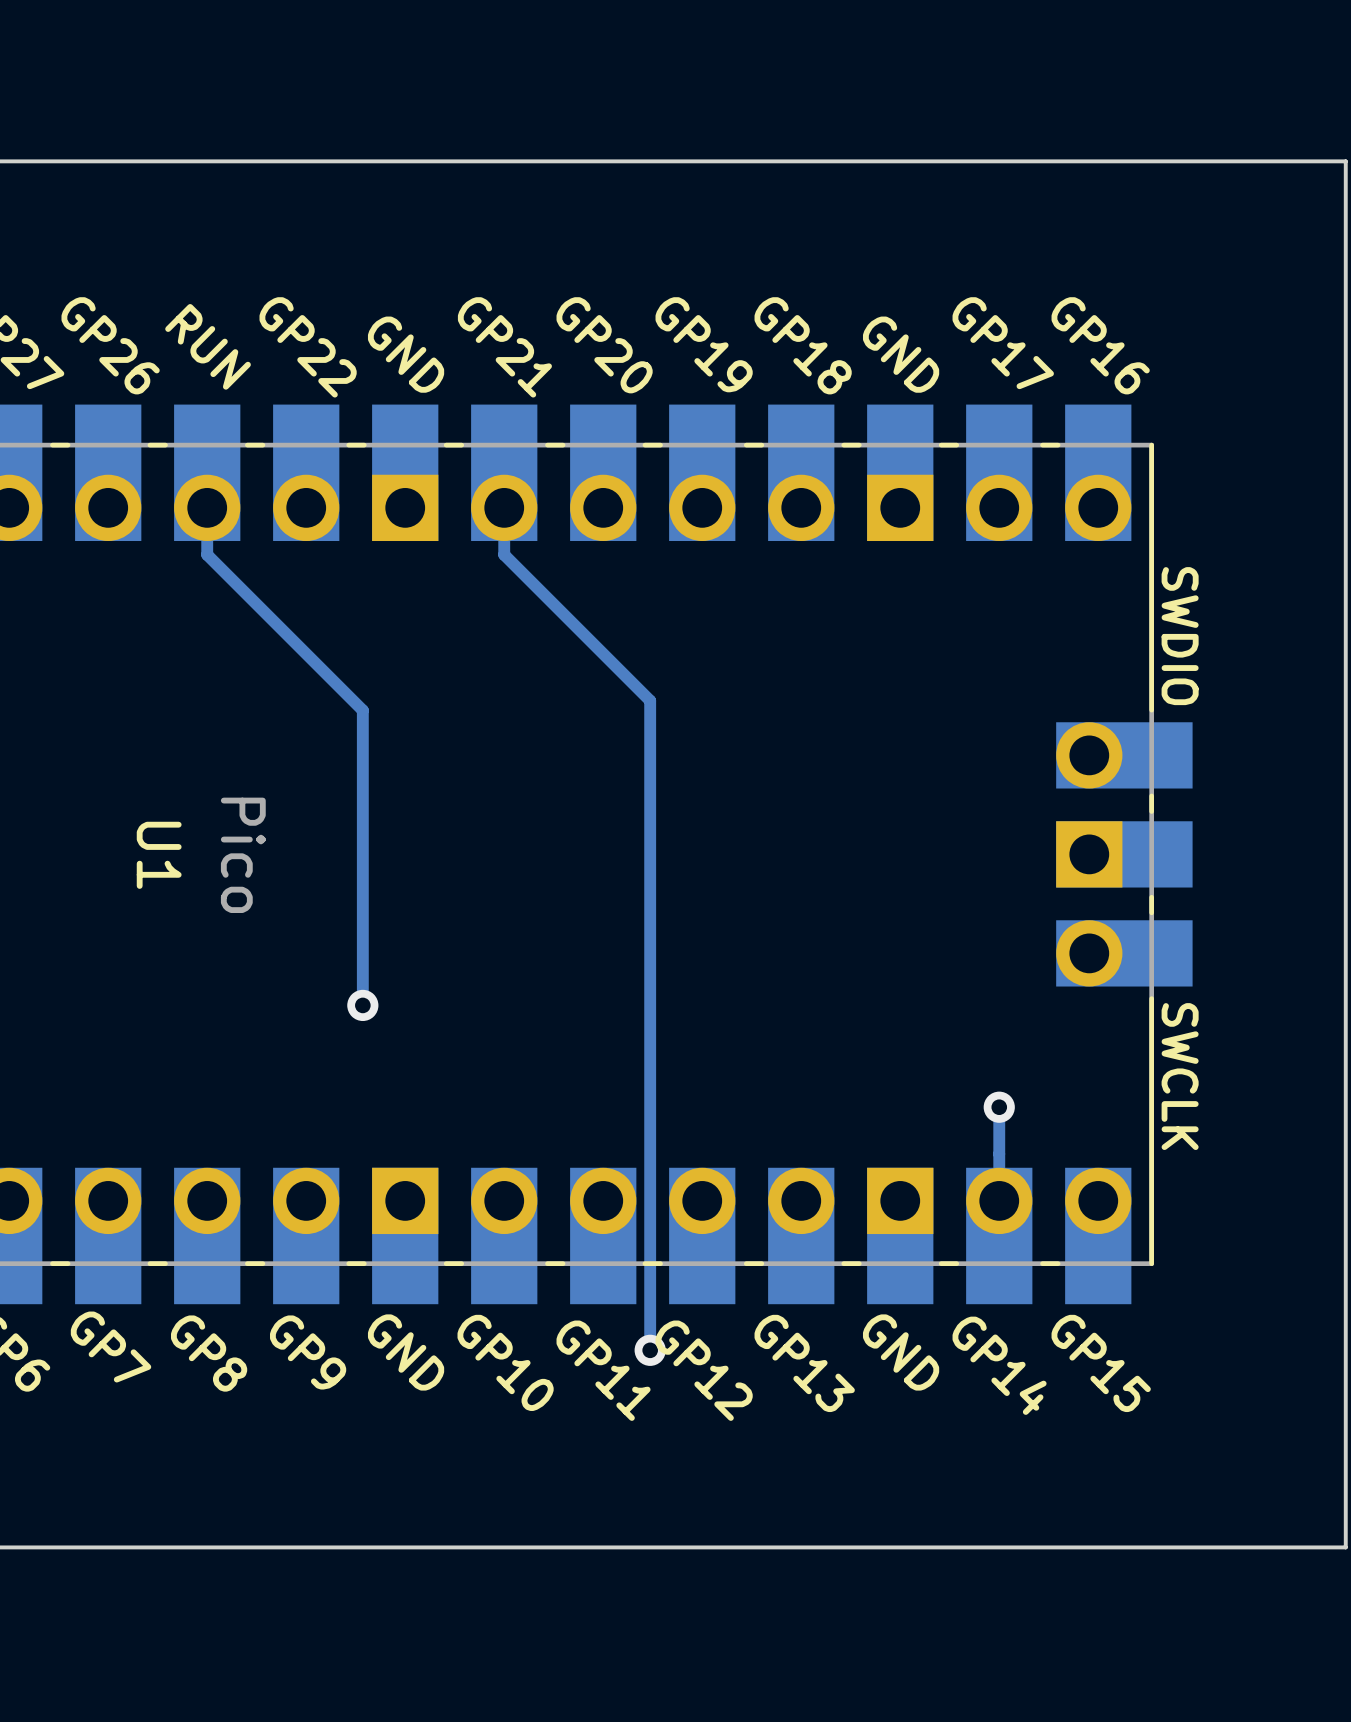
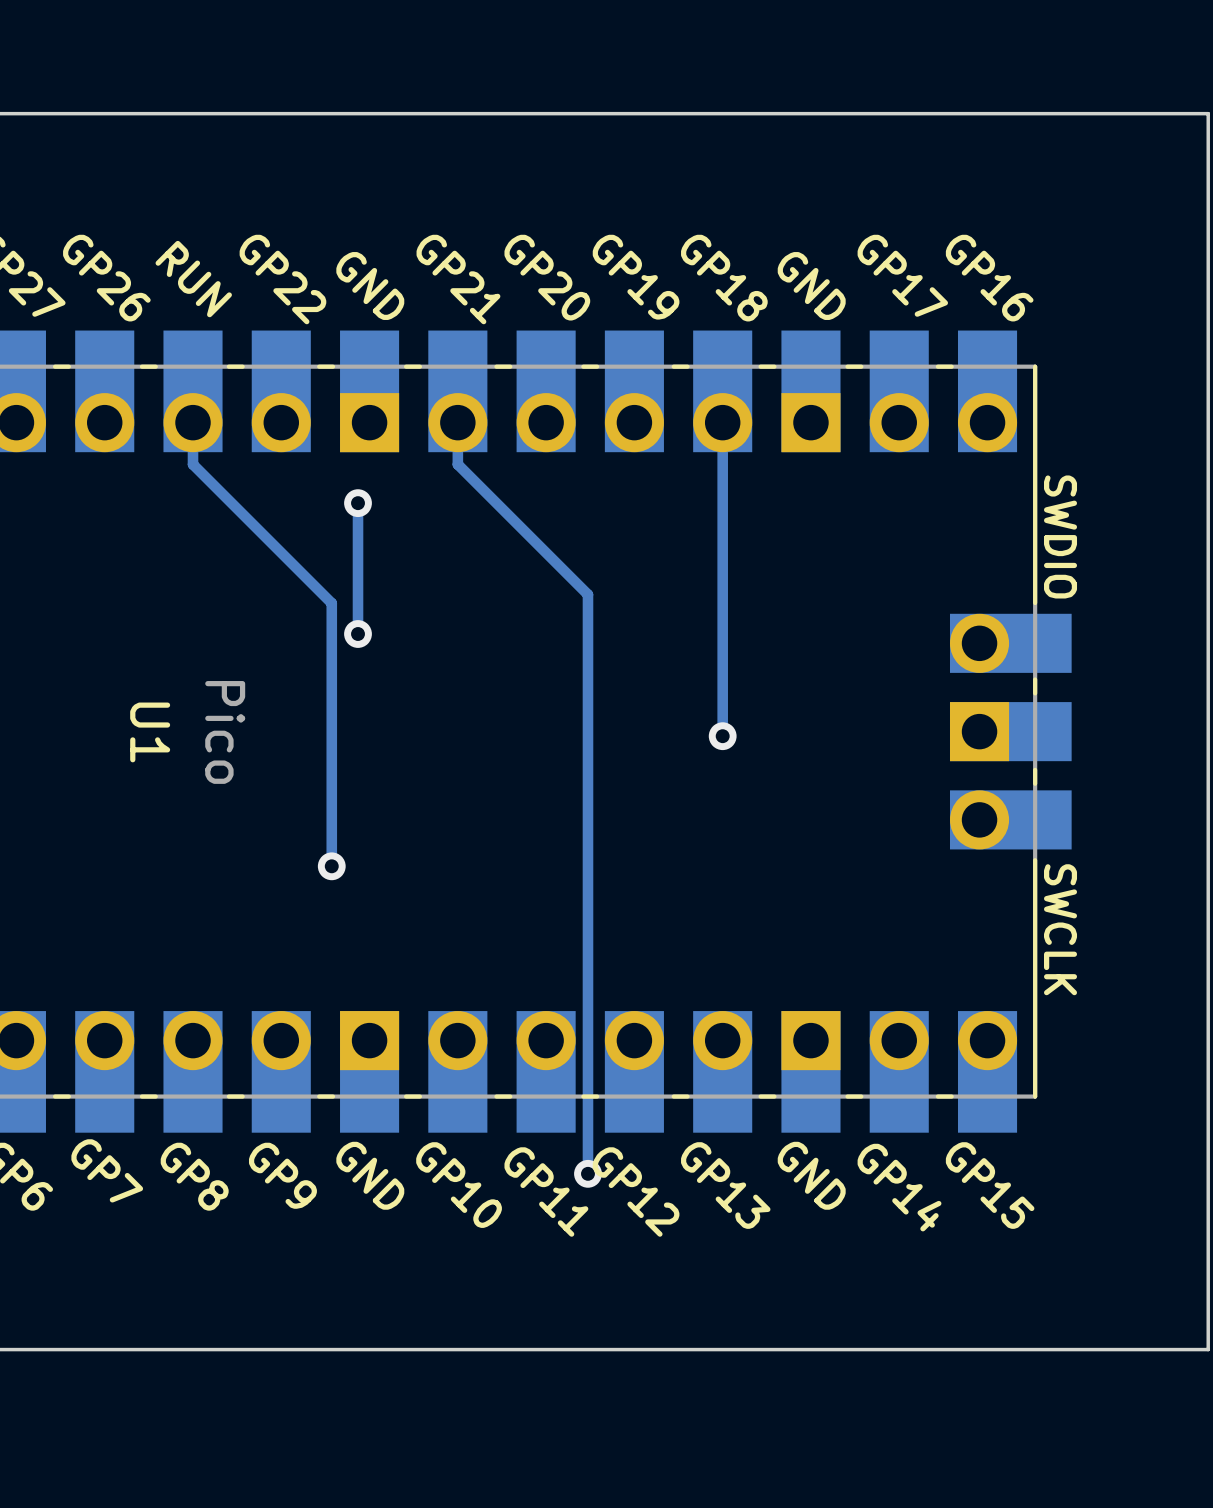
track: none -> (722, 422) (722, 736)
track: none -> (358, 503) (358, 634)
via: none -> (358, 503)
via: none -> (358, 634)
via: none -> (722, 736)
track: (999, 1107) (999, 1200) -> none
via: (999, 1107) -> none

